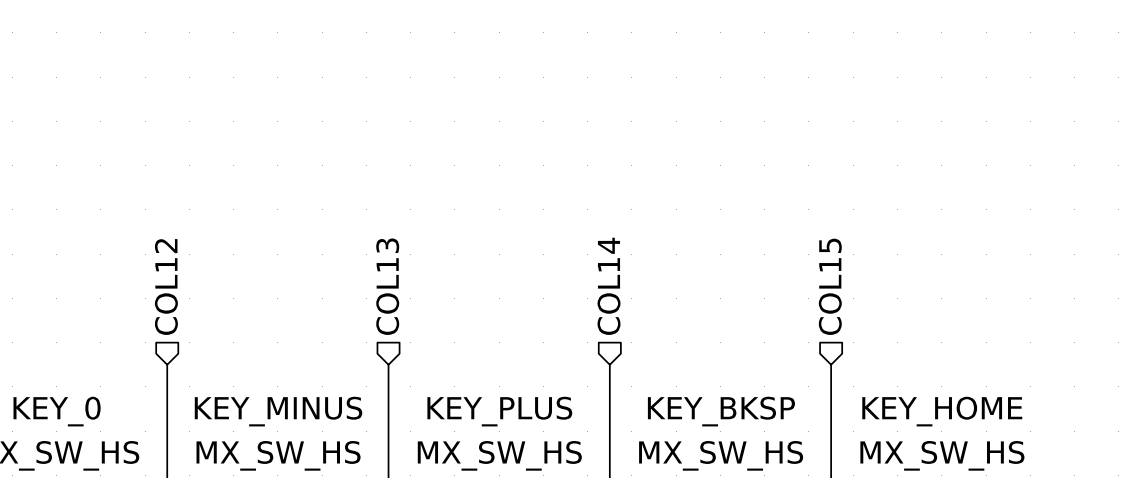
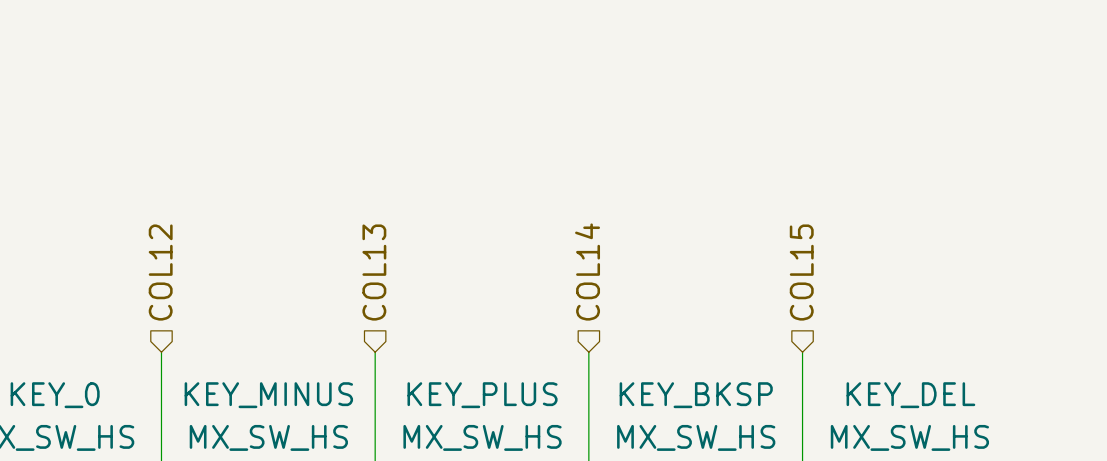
KEY_HOME name: KEY_HOME (942, 411) -> KEY_DEL (910, 395)

